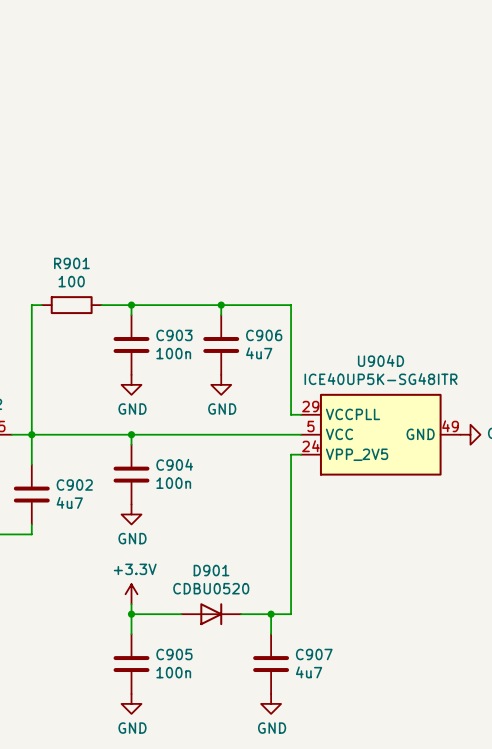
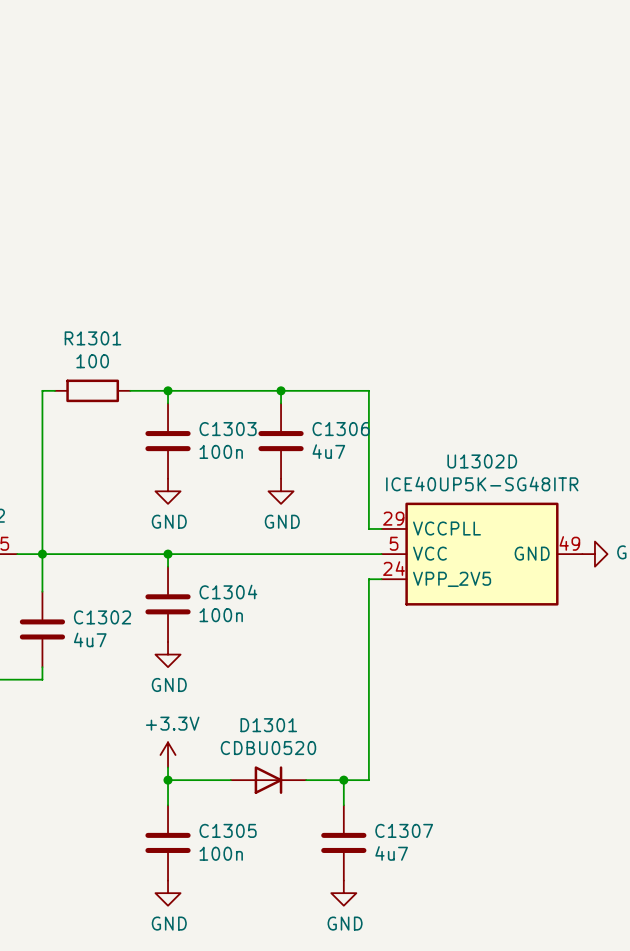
R901 name: R901 (71, 263) -> R1301 (92, 338)
C903 name: C903 (174, 335) -> C1303 (228, 429)
C906 name: C906 (264, 335) -> C1306 (341, 429)
U904D name: U904D (381, 360) -> U1302D (482, 461)
C904 name: C904 (174, 464) -> C1304 (228, 592)
C902 name: C902 (74, 484) -> C1302 (102, 617)
D901 name: D901 (211, 570) -> D1301 (268, 725)
C905 name: C905 (174, 654) -> C1305 (228, 830)
C907 name: C907 (314, 654) -> C1307 (404, 830)

